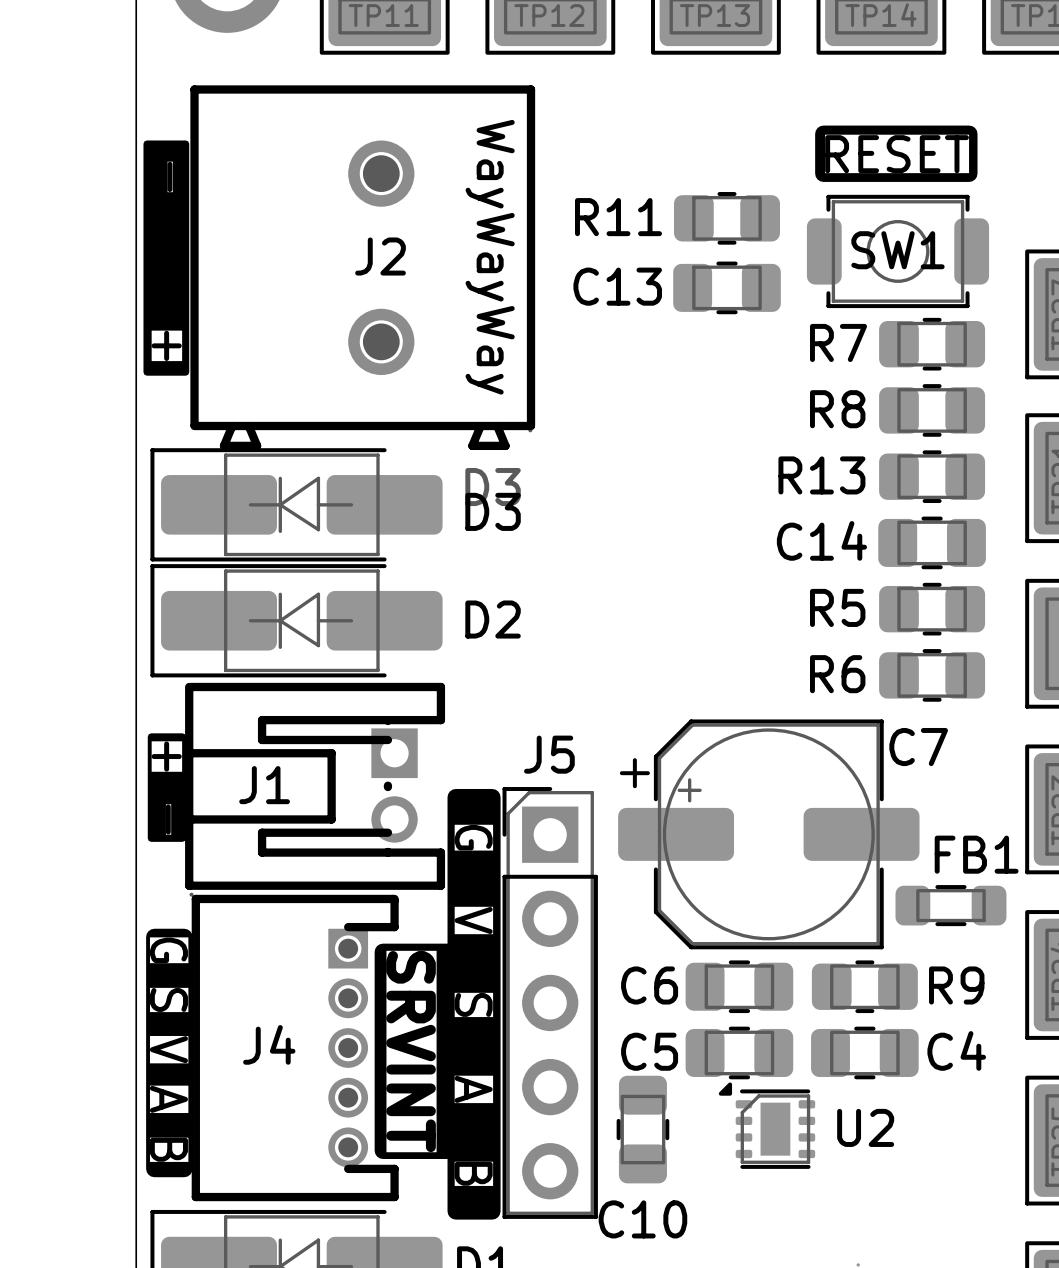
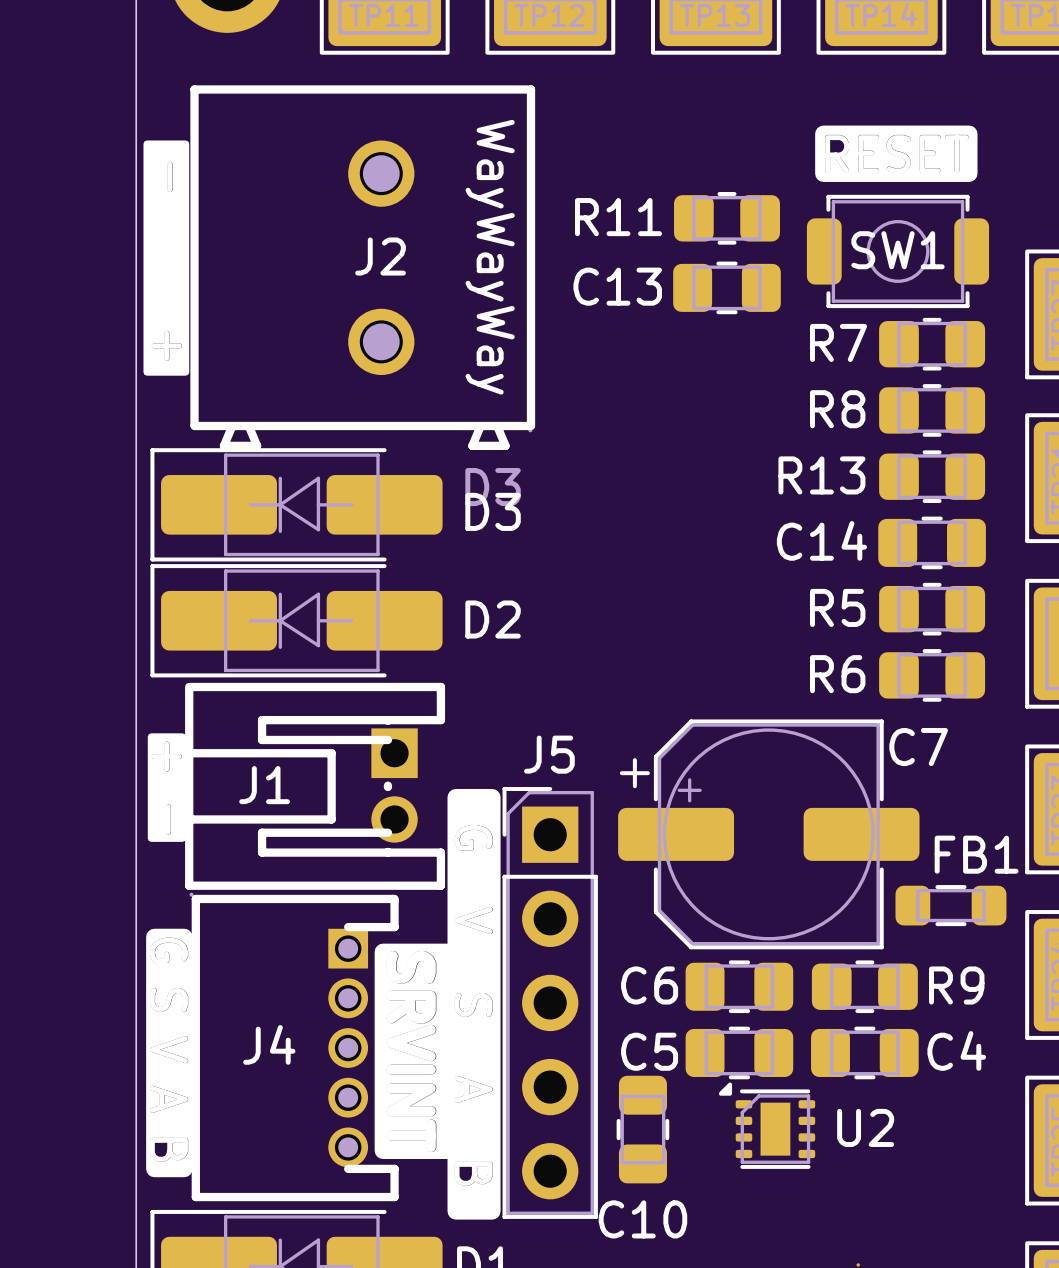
drawing shape: [815, 125, 978, 182] -> [815, 125, 978, 182]
drawing shape: [143, 140, 190, 376] -> [143, 140, 190, 376]
drawing shape: [147, 733, 186, 842] -> [147, 733, 186, 842]
drawing shape: [374, 788, 501, 1220] -> [374, 788, 501, 1220]
drawing shape: [146, 928, 193, 1178] -> [146, 928, 193, 1178]
drawing: none -> [415, 1000, 427, 1014]
drawing: none -> [469, 1084, 483, 1094]
drawing: none -> [164, 1094, 184, 1156]
drawing: none -> [477, 1166, 488, 1180]

